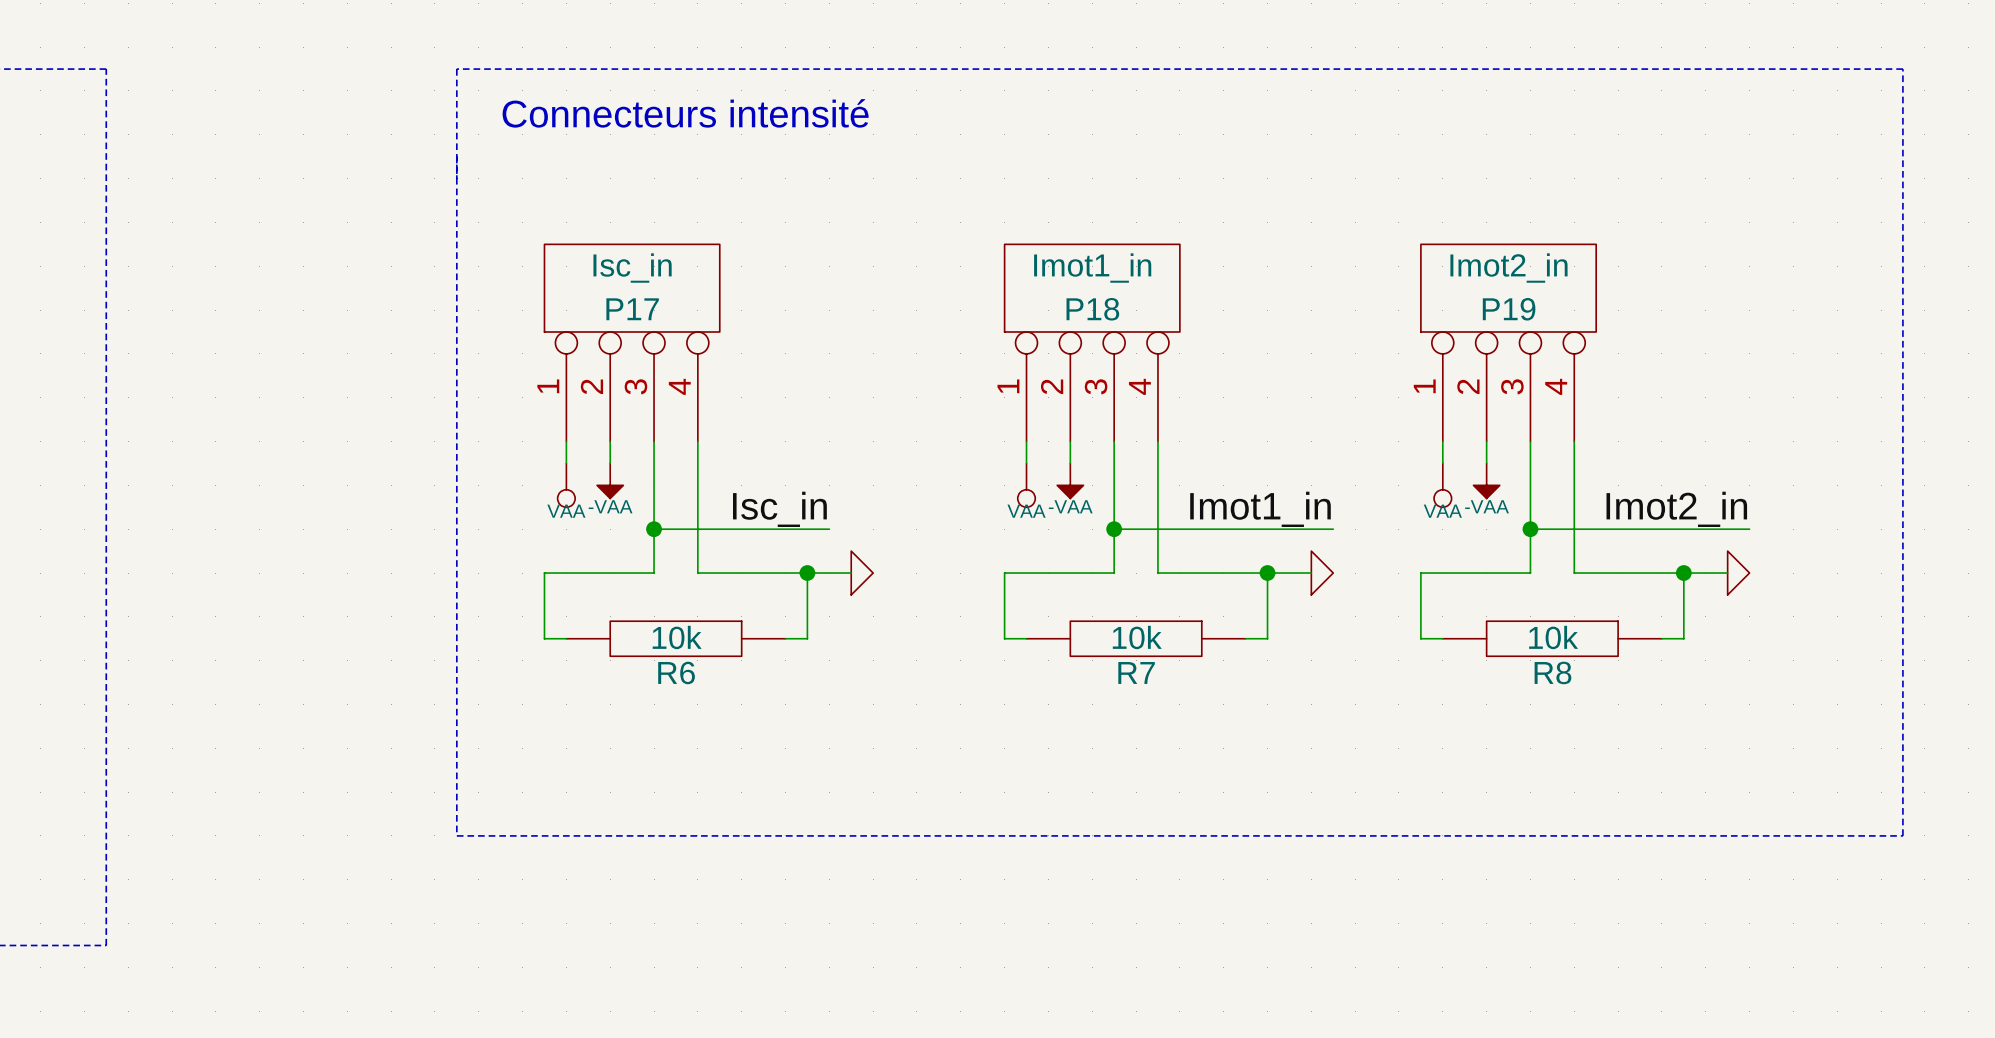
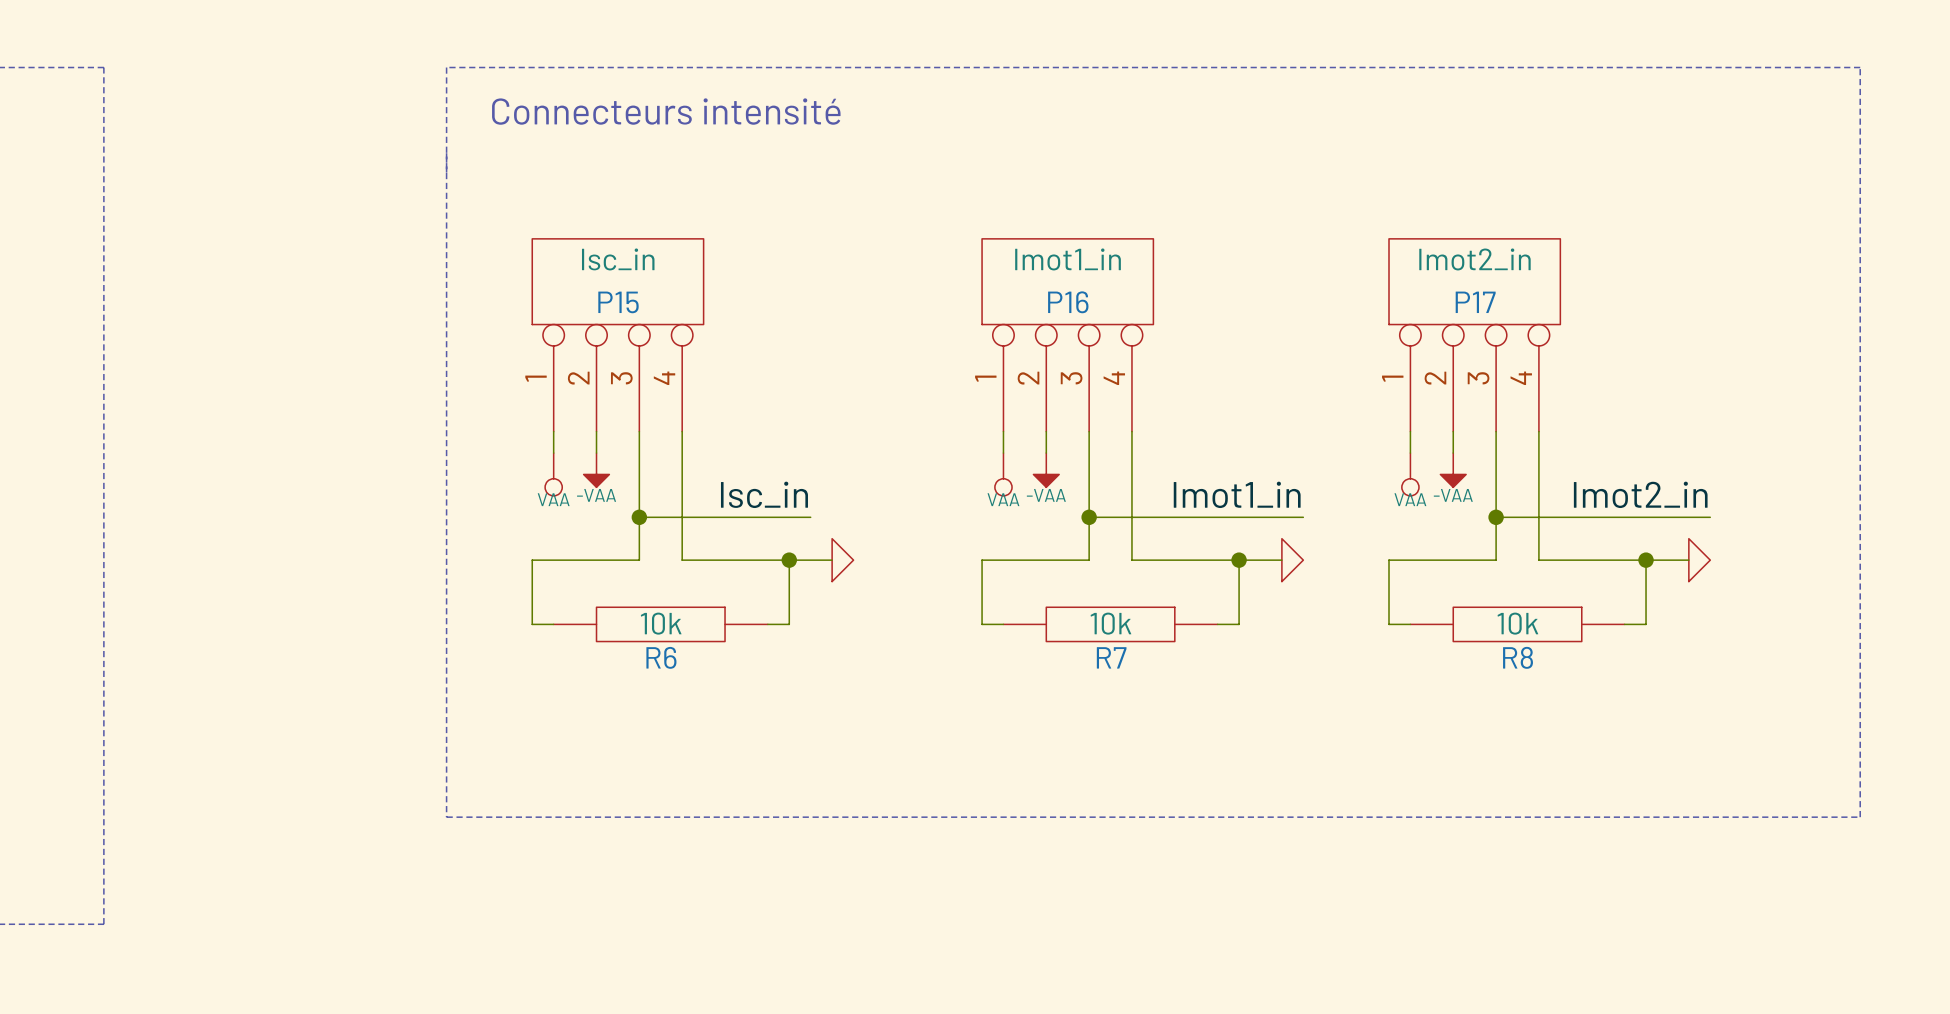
P17 name: P17 (632, 309) -> P15 (618, 302)
P18 name: P18 (1092, 309) -> P16 (1068, 302)
P19 name: P19 (1509, 309) -> P17 (1475, 302)

